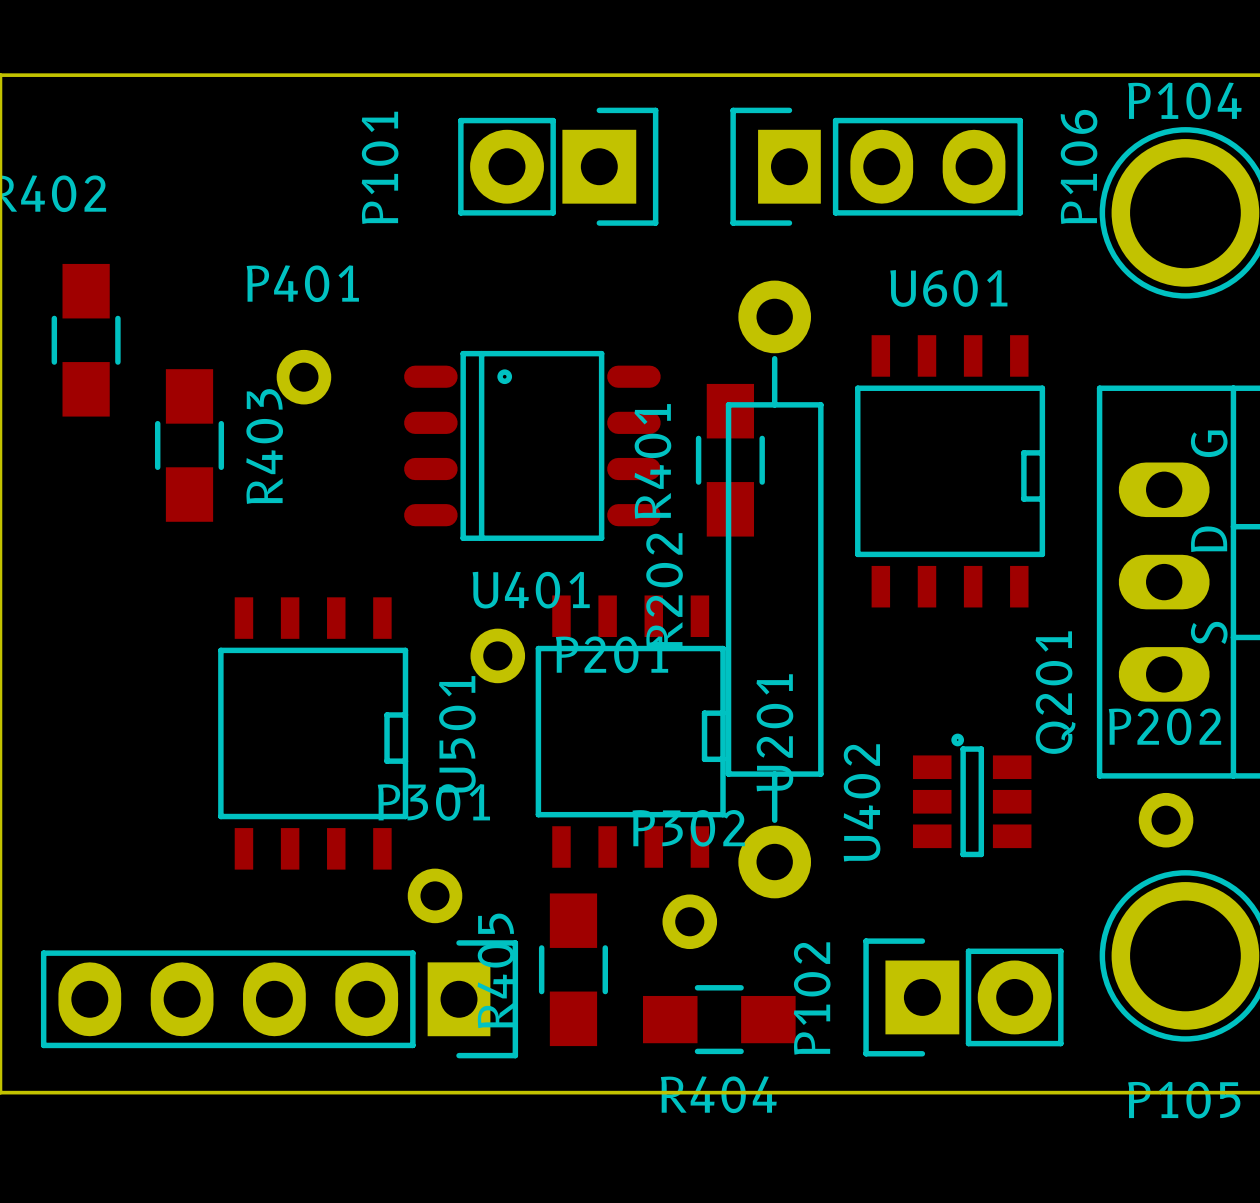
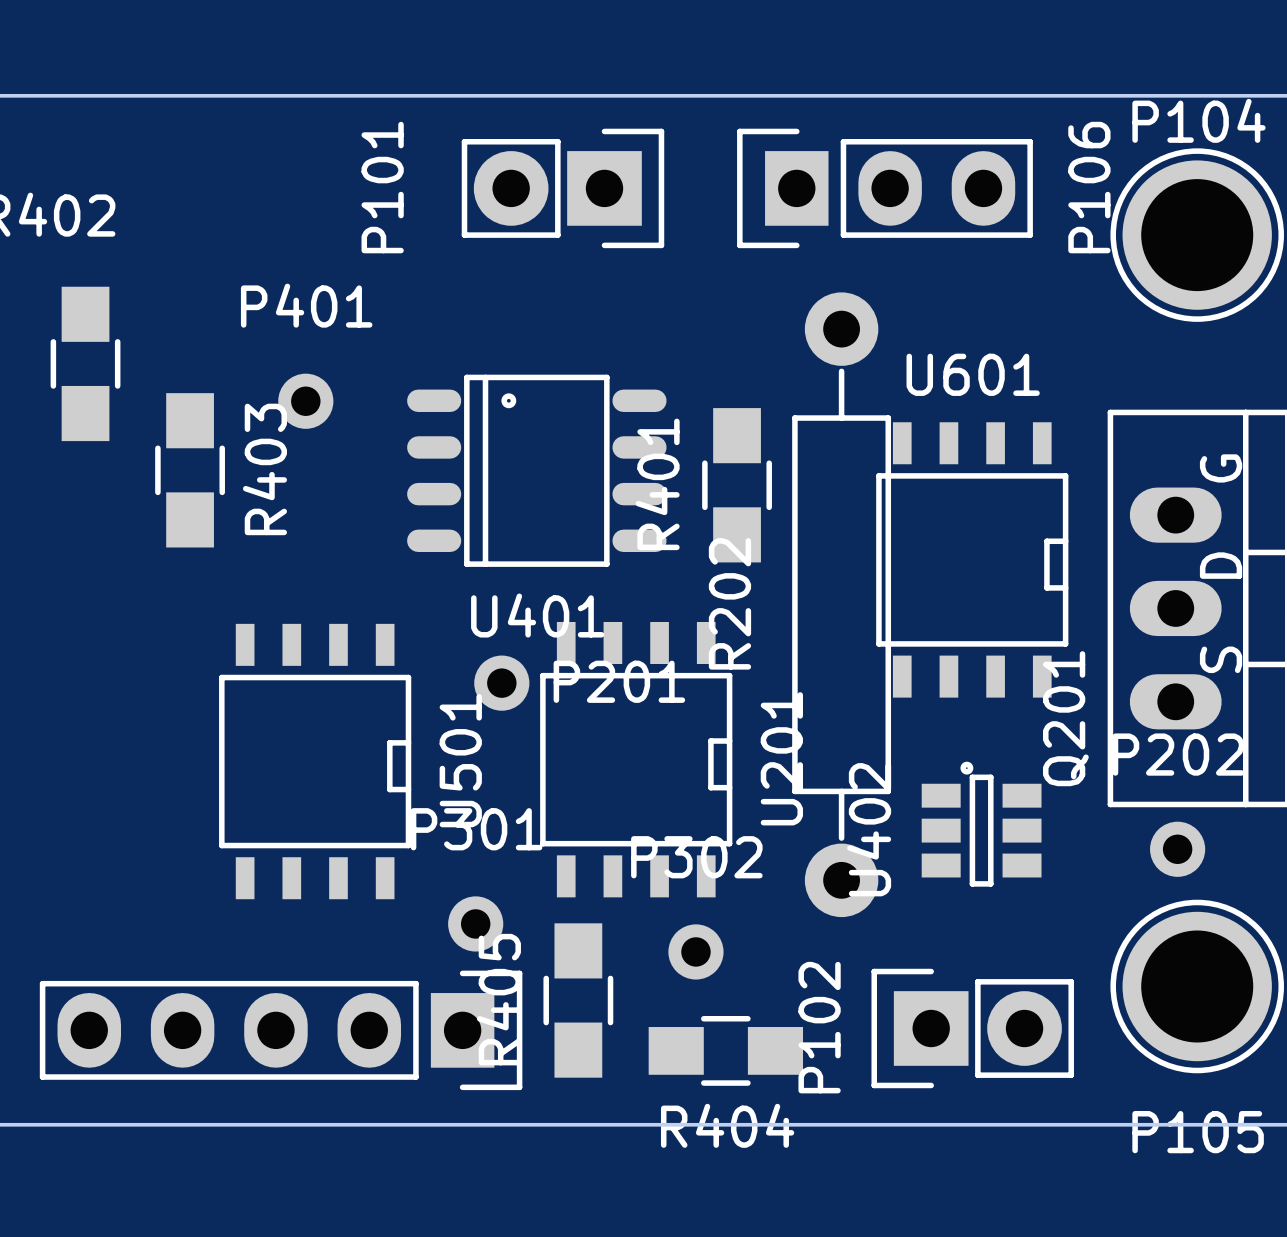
U601 position: (950, 471) -> (972, 559)
R202 position: (774, 589) -> (841, 604)
P301 position: (435, 895) -> (475, 923)

